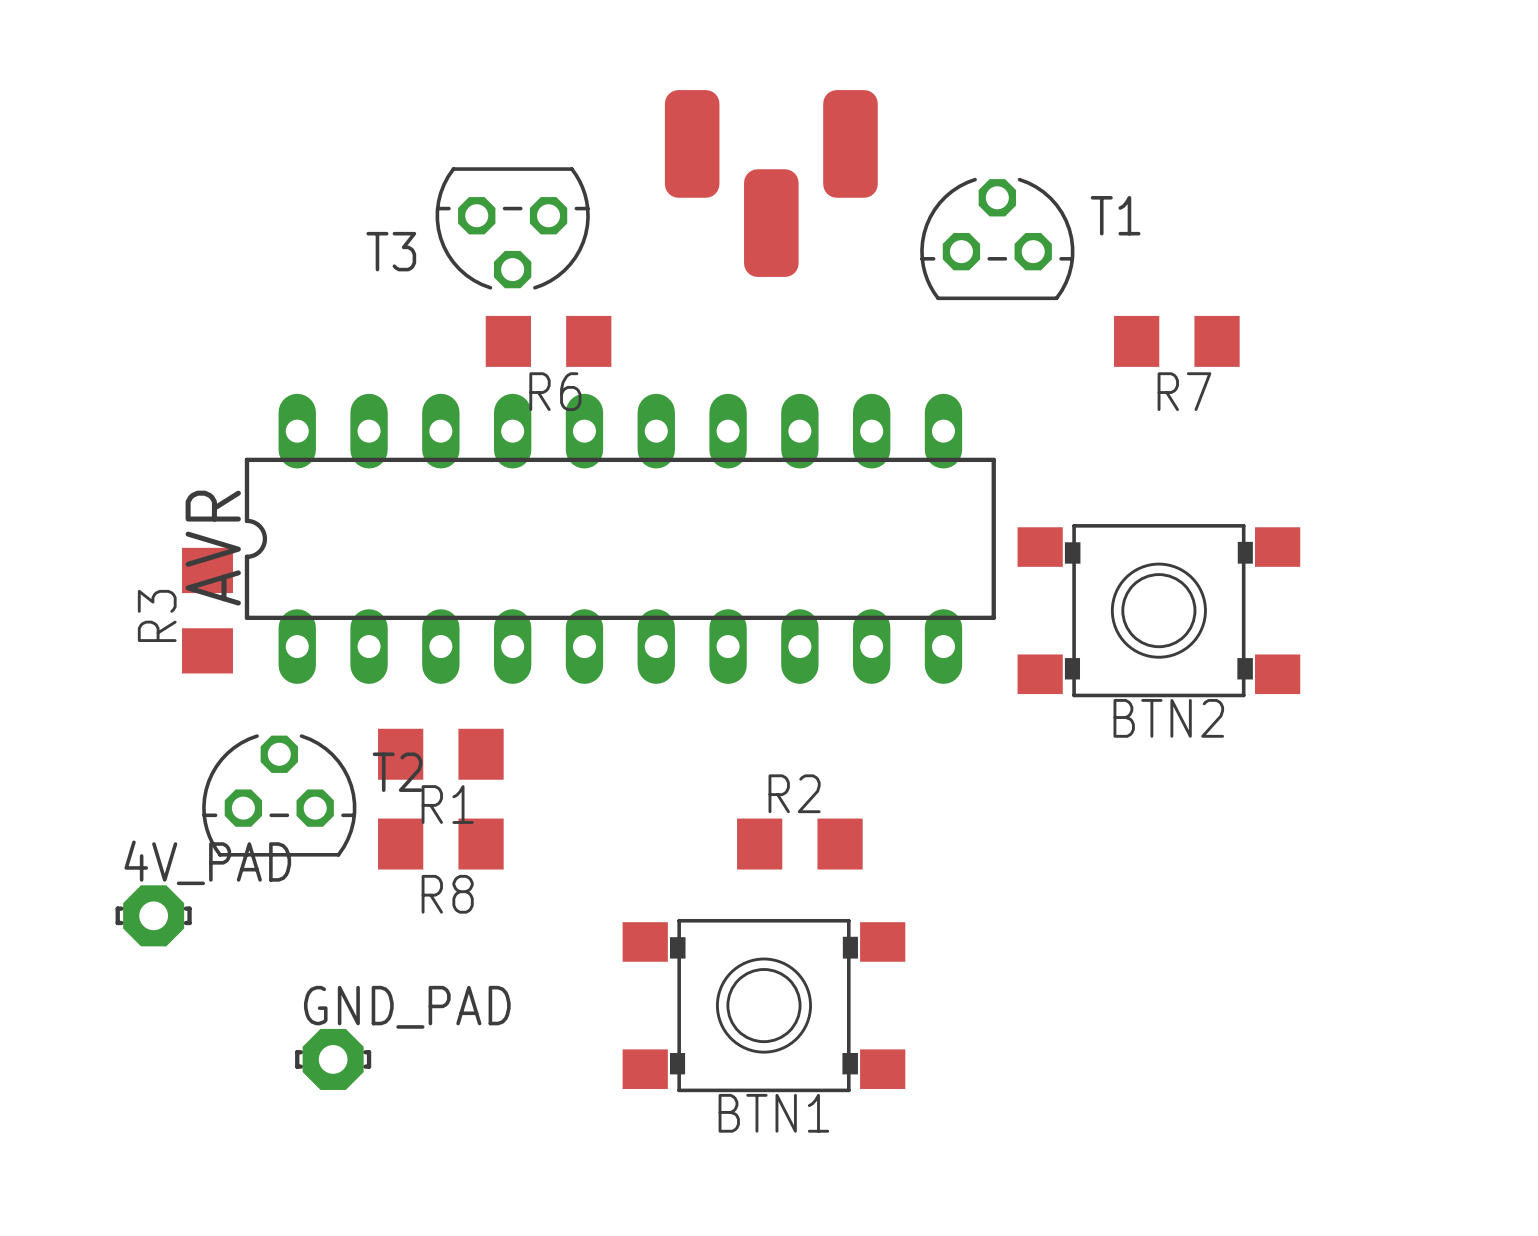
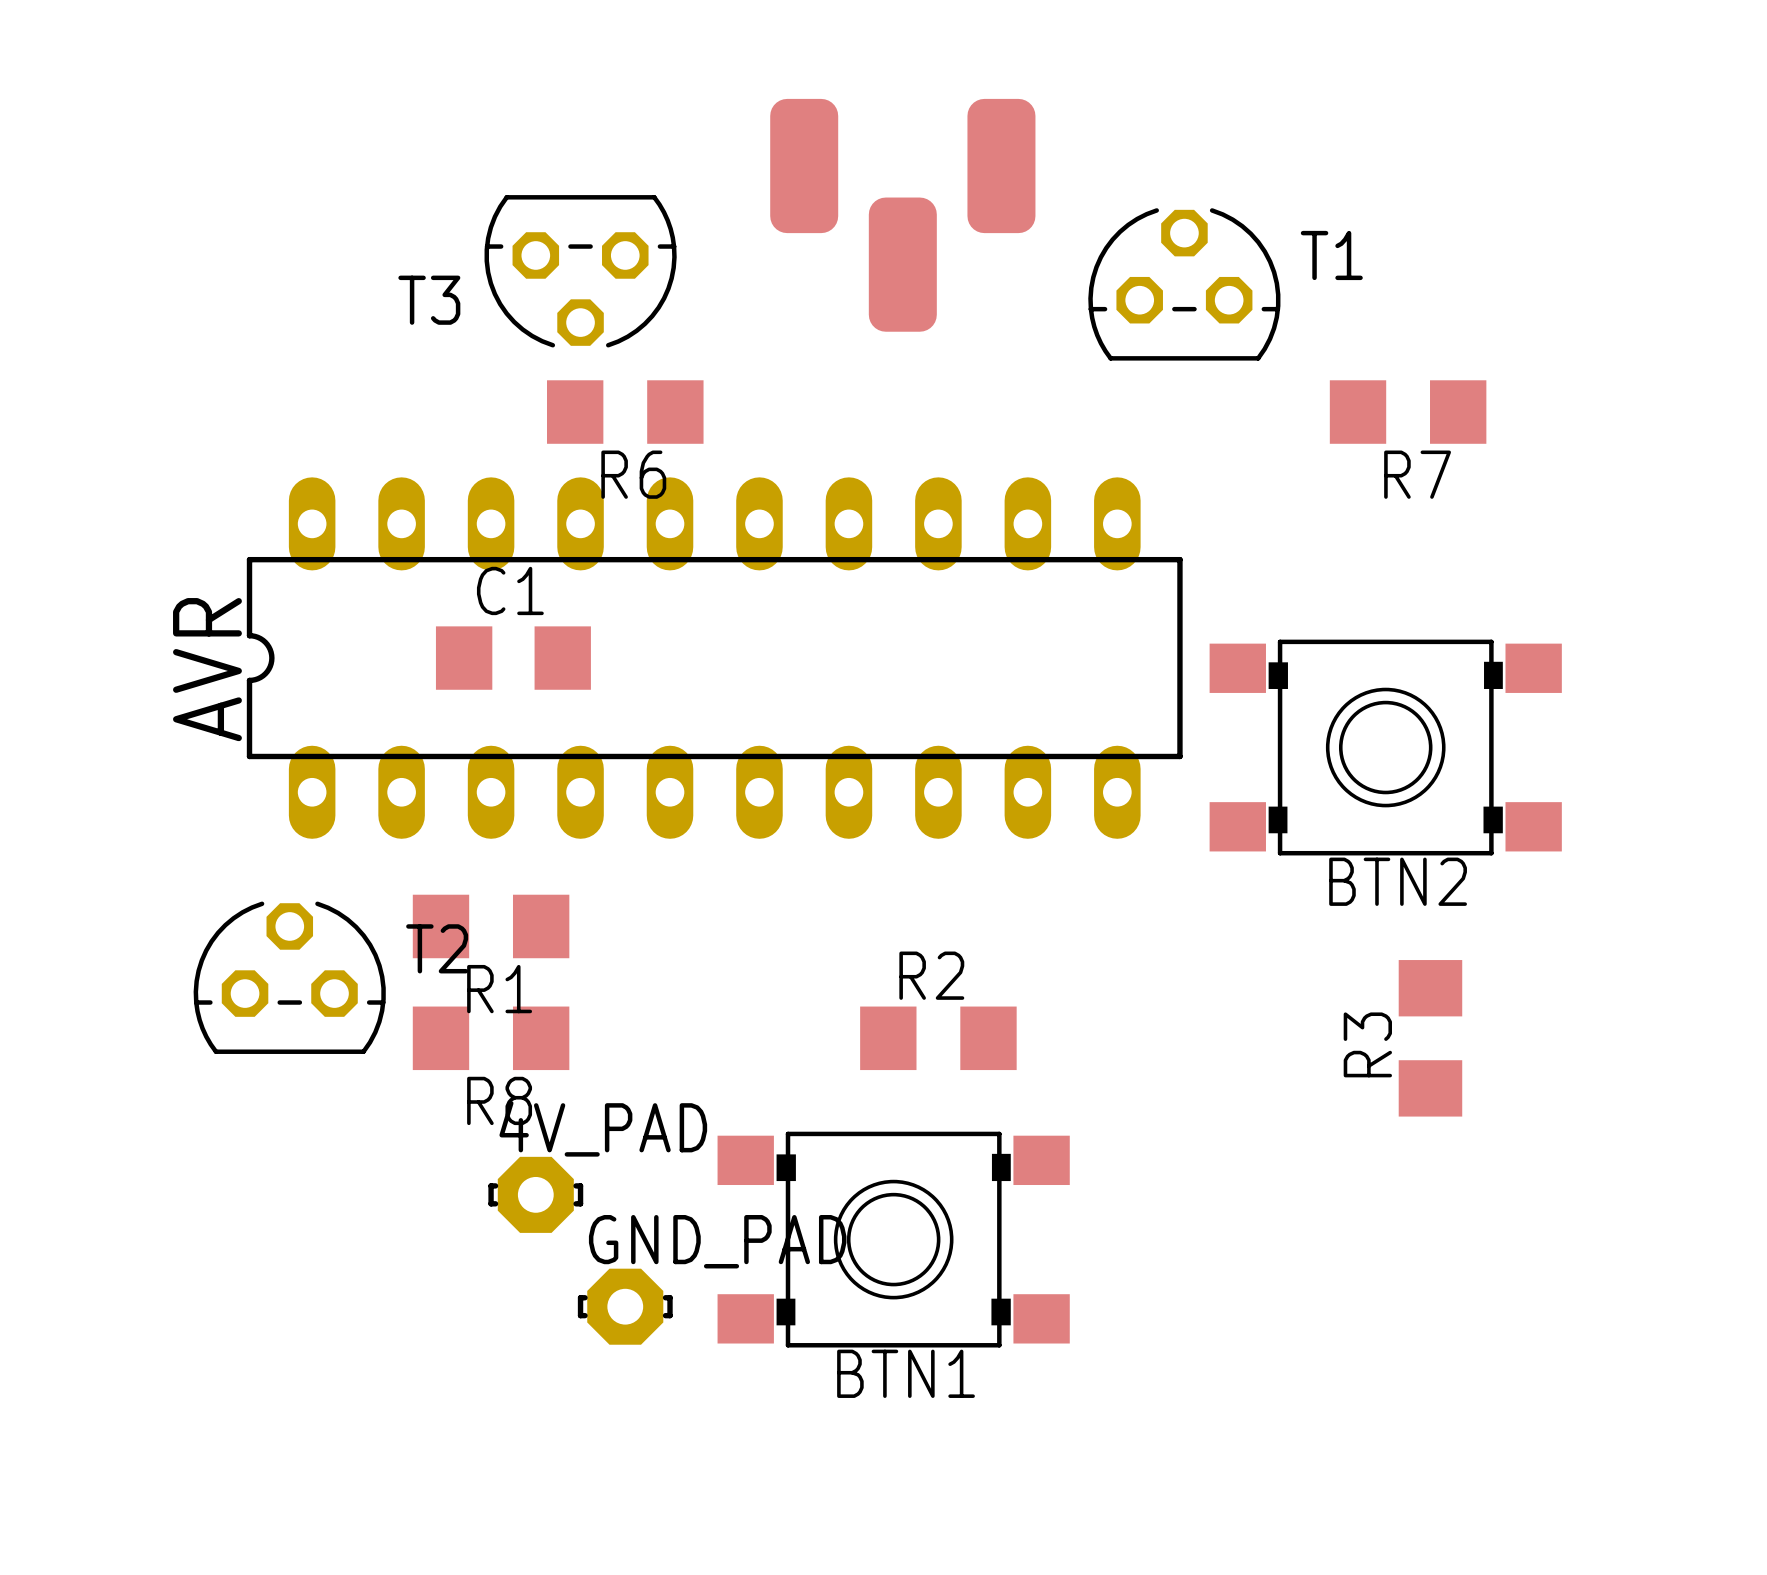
C1: none -> (513, 658)
R3 position: (207, 610) -> (1430, 1038)
4V_PAD position: (153, 915) -> (535, 1194)
GND_PAD position: (333, 1059) -> (625, 1306)

